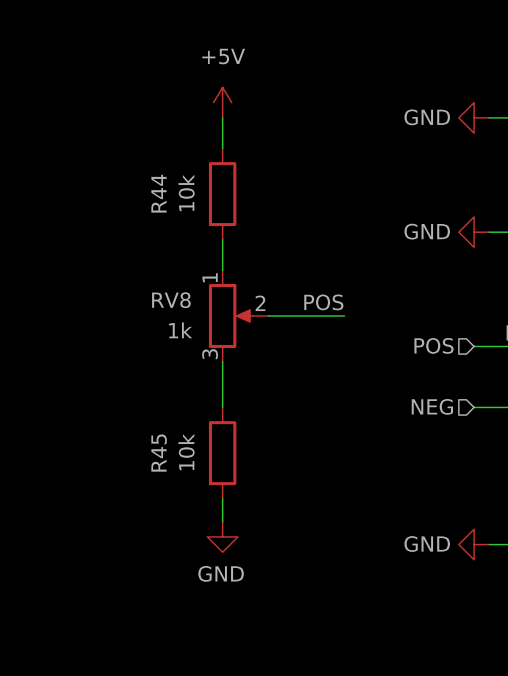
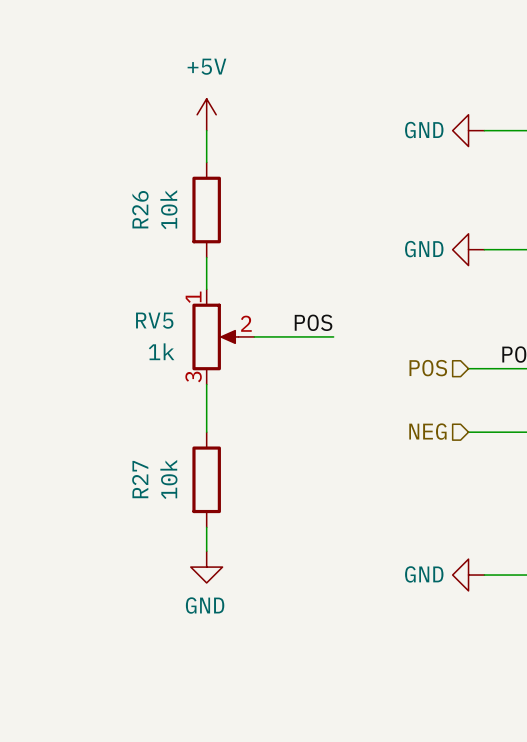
R44 name: R44 (158, 193) -> R26 (140, 209)
RV8 name: RV8 (171, 300) -> RV5 (154, 320)
R45 name: R45 (159, 453) -> R27 (140, 479)

